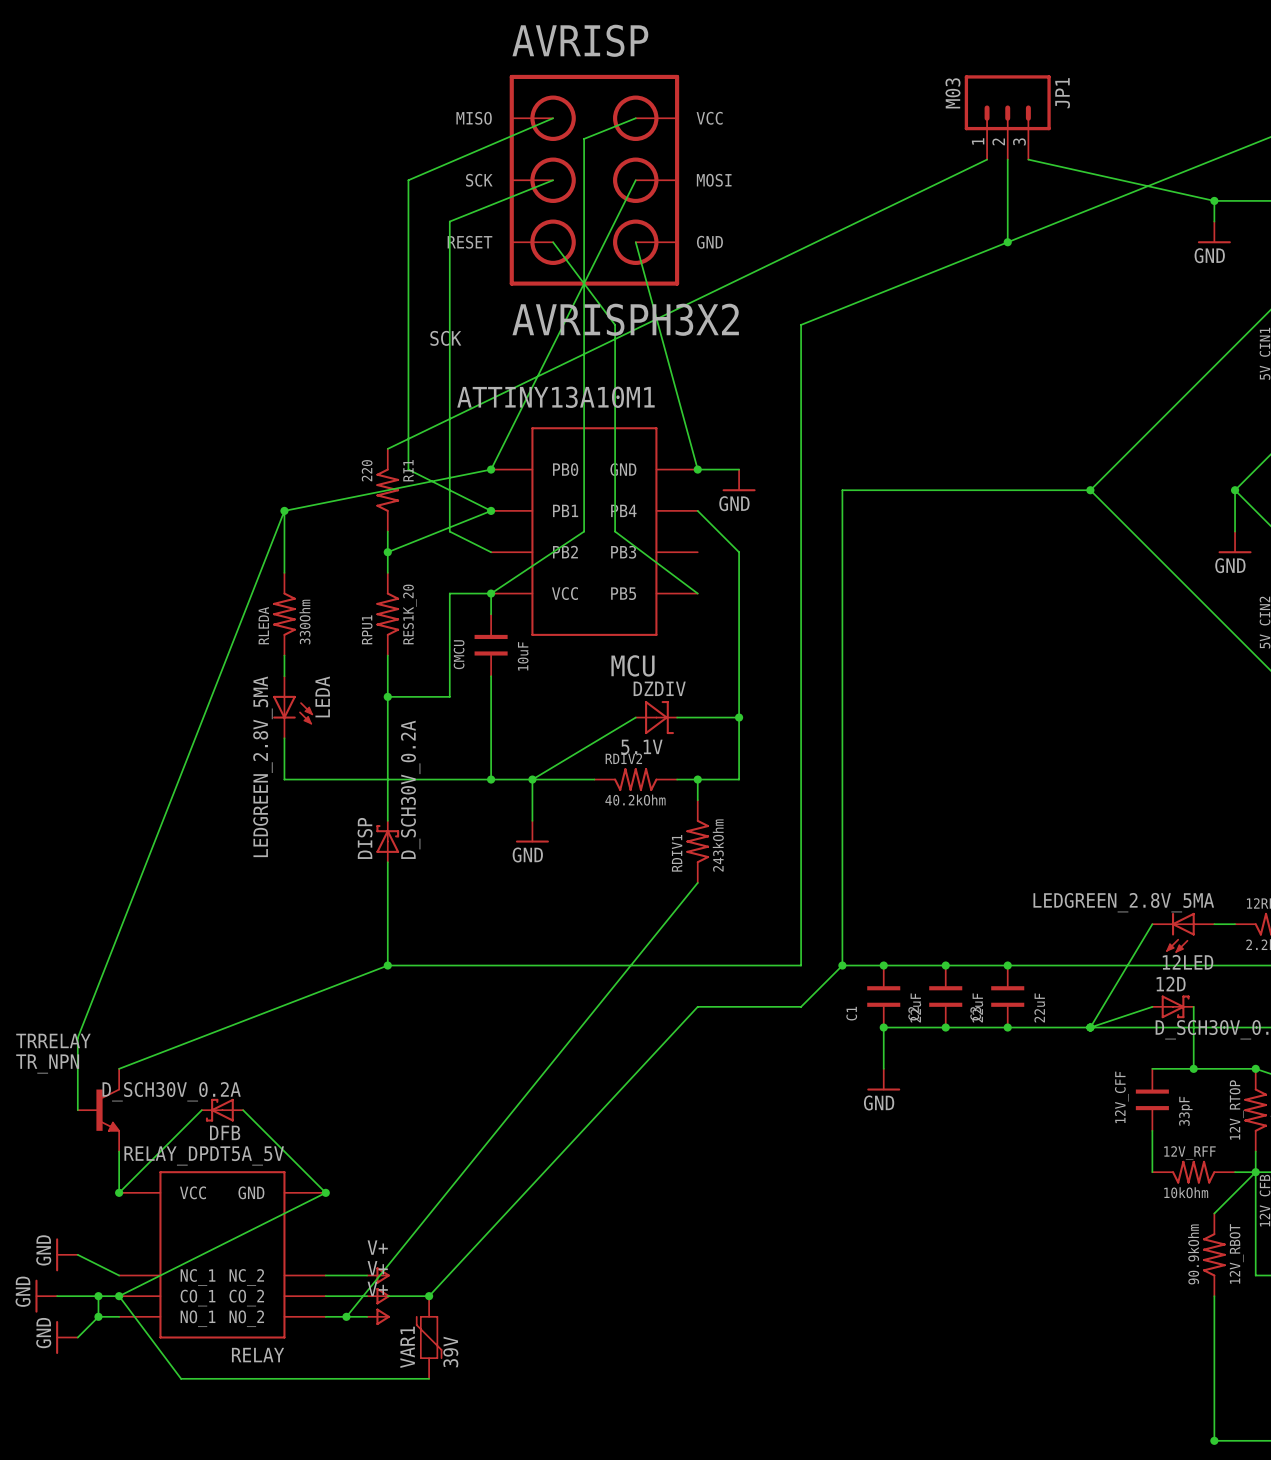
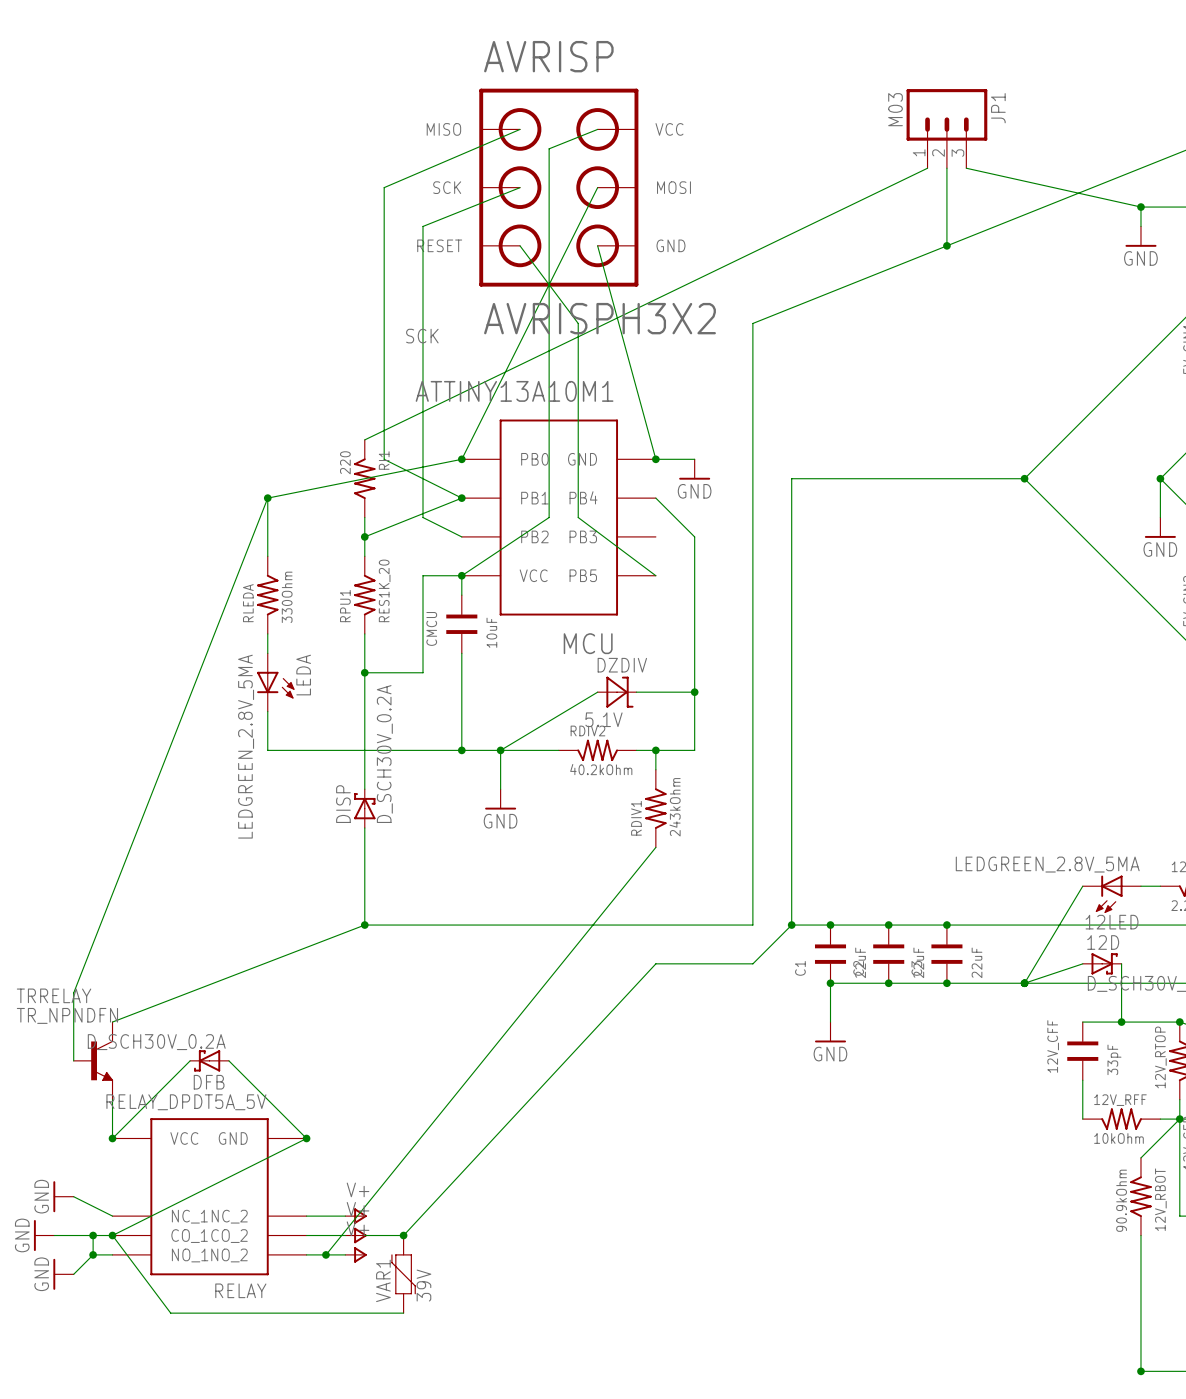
TRRELAY value: TR_NPN (47, 1063) -> TR_NPNDFN (67, 1015)

